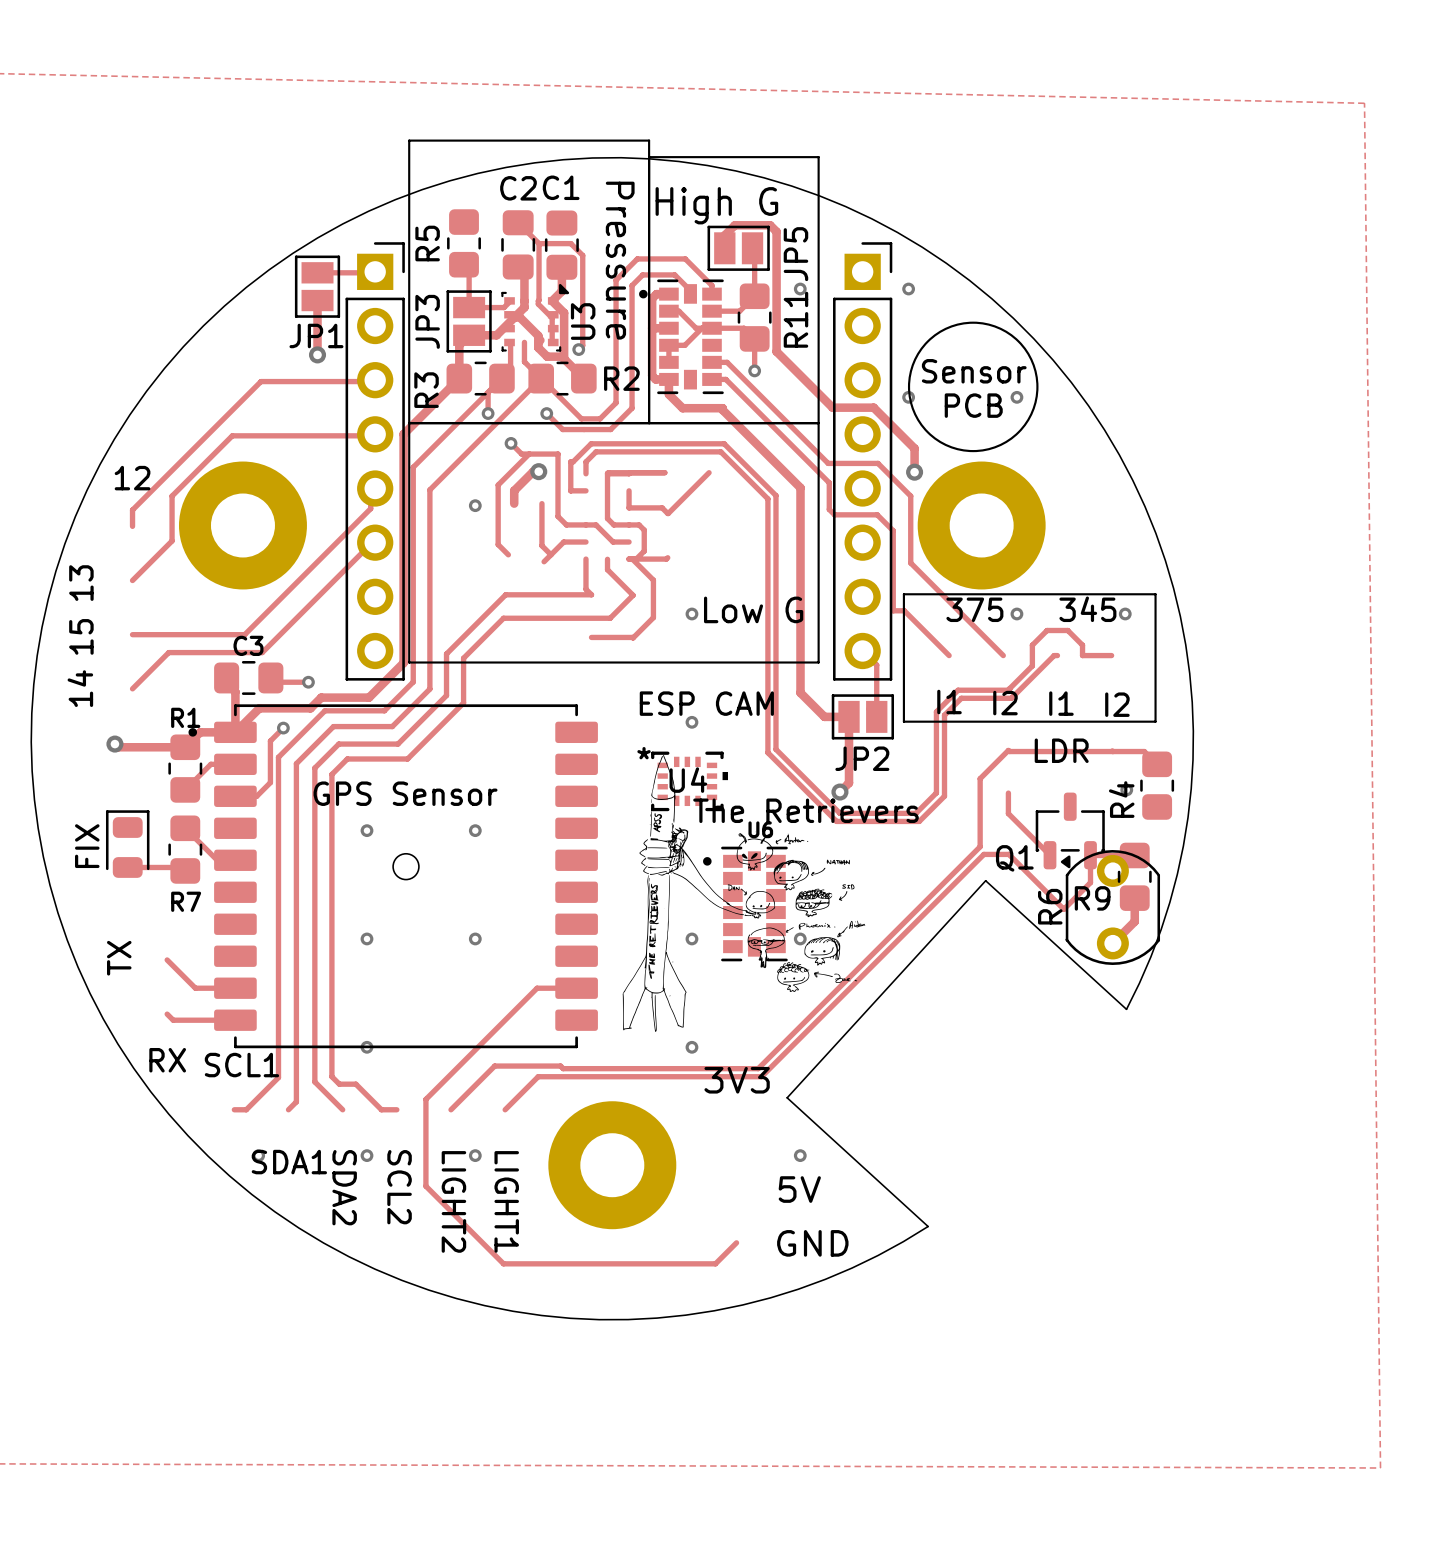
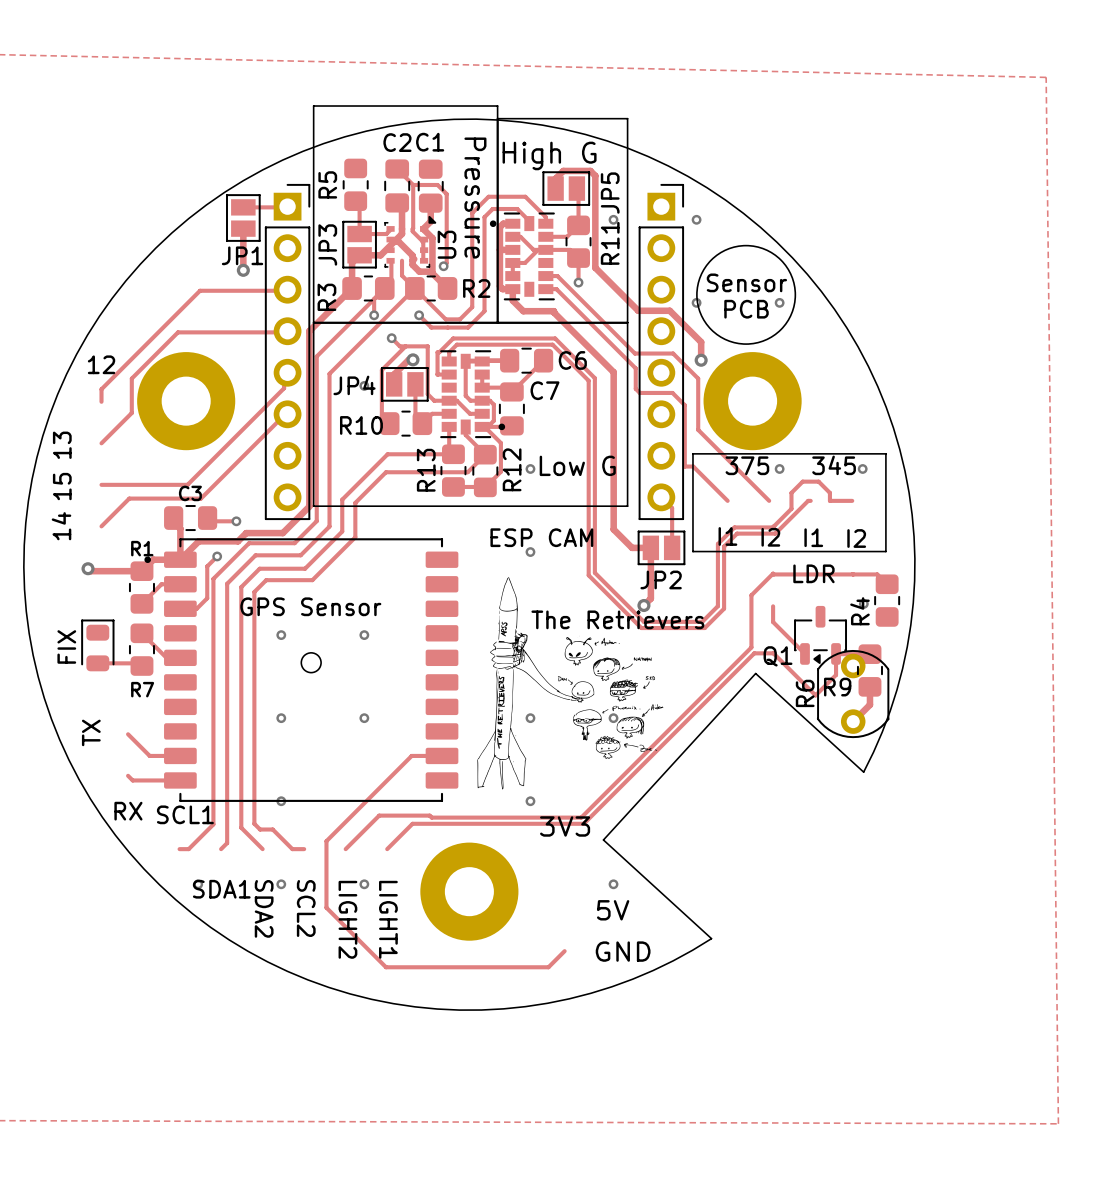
C6: none -> (526, 360)
JP4: none -> (404, 384)
part: none -> (472, 394)
C7: none -> (511, 408)
R10: none -> (406, 423)
R13: none -> (453, 470)
R12: none -> (485, 471)
U4: (689, 781) -> none
U6: (745, 903) -> none

